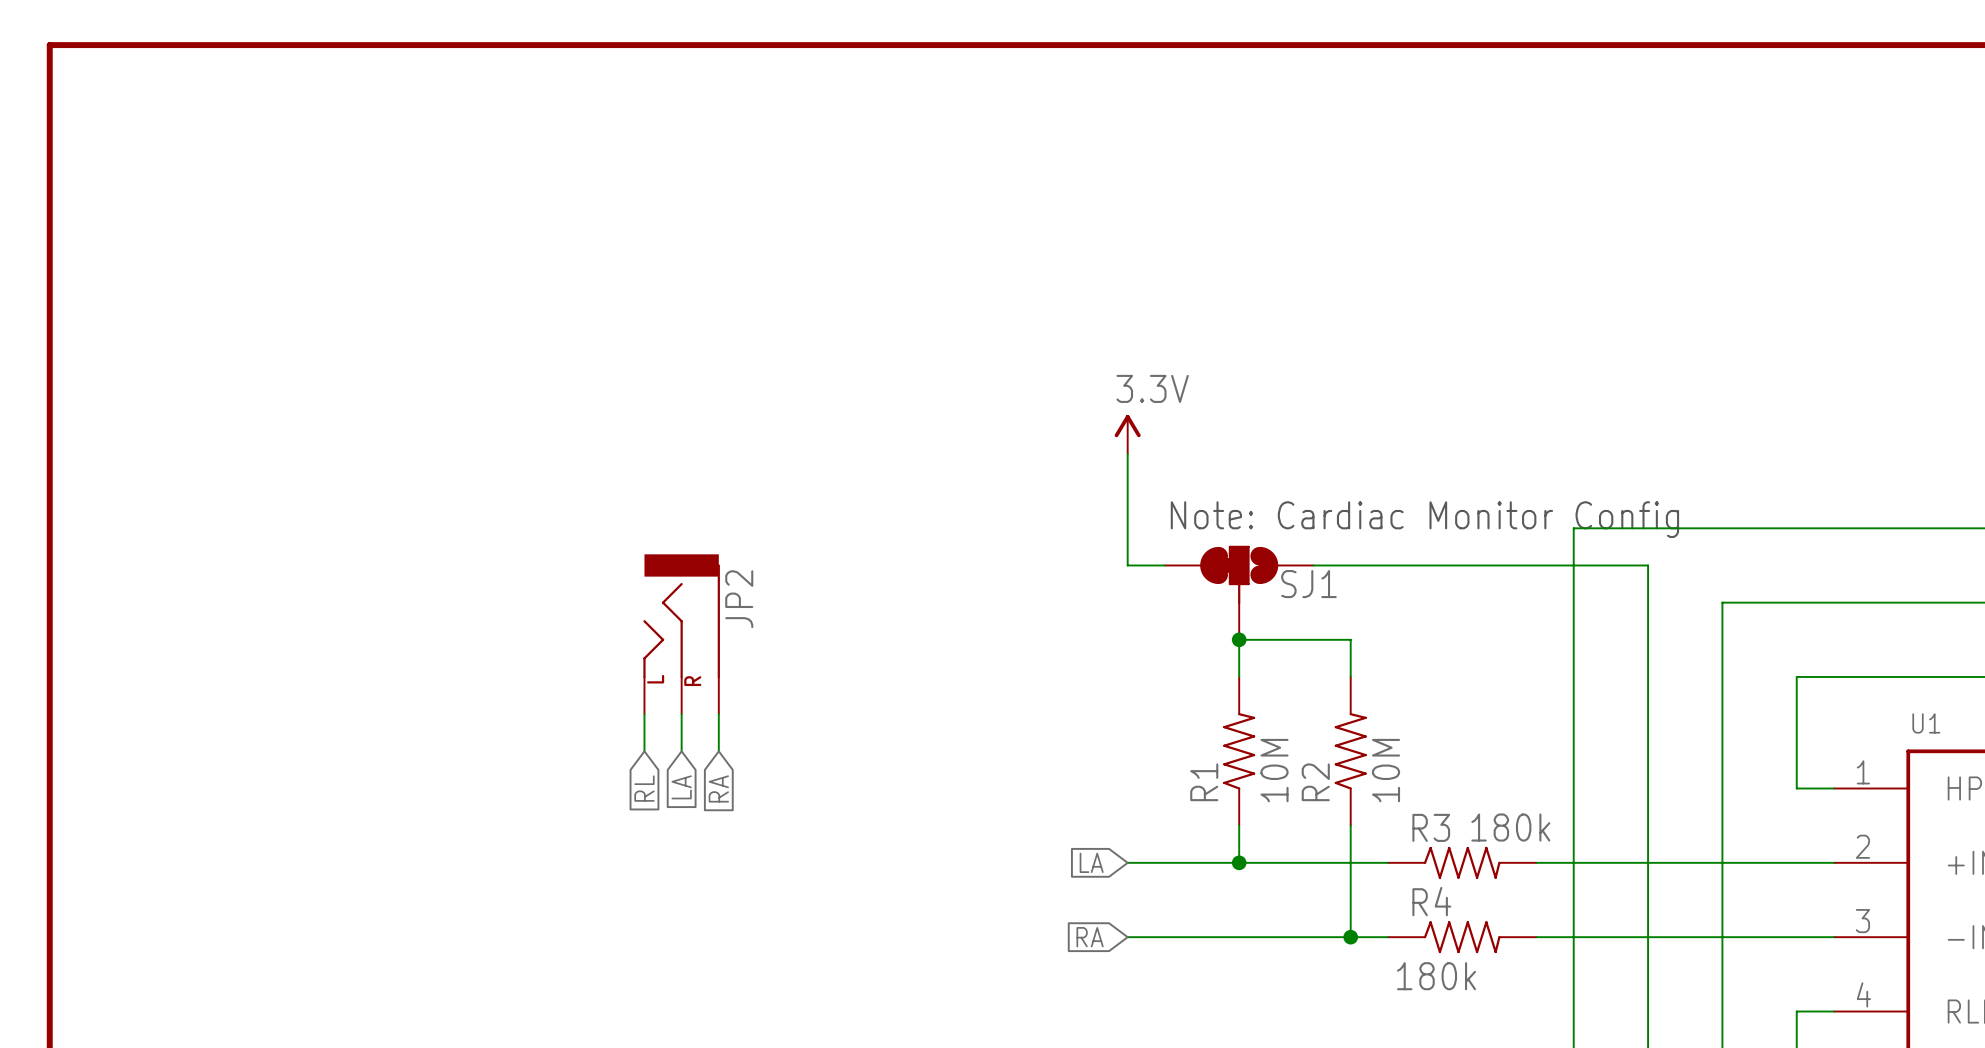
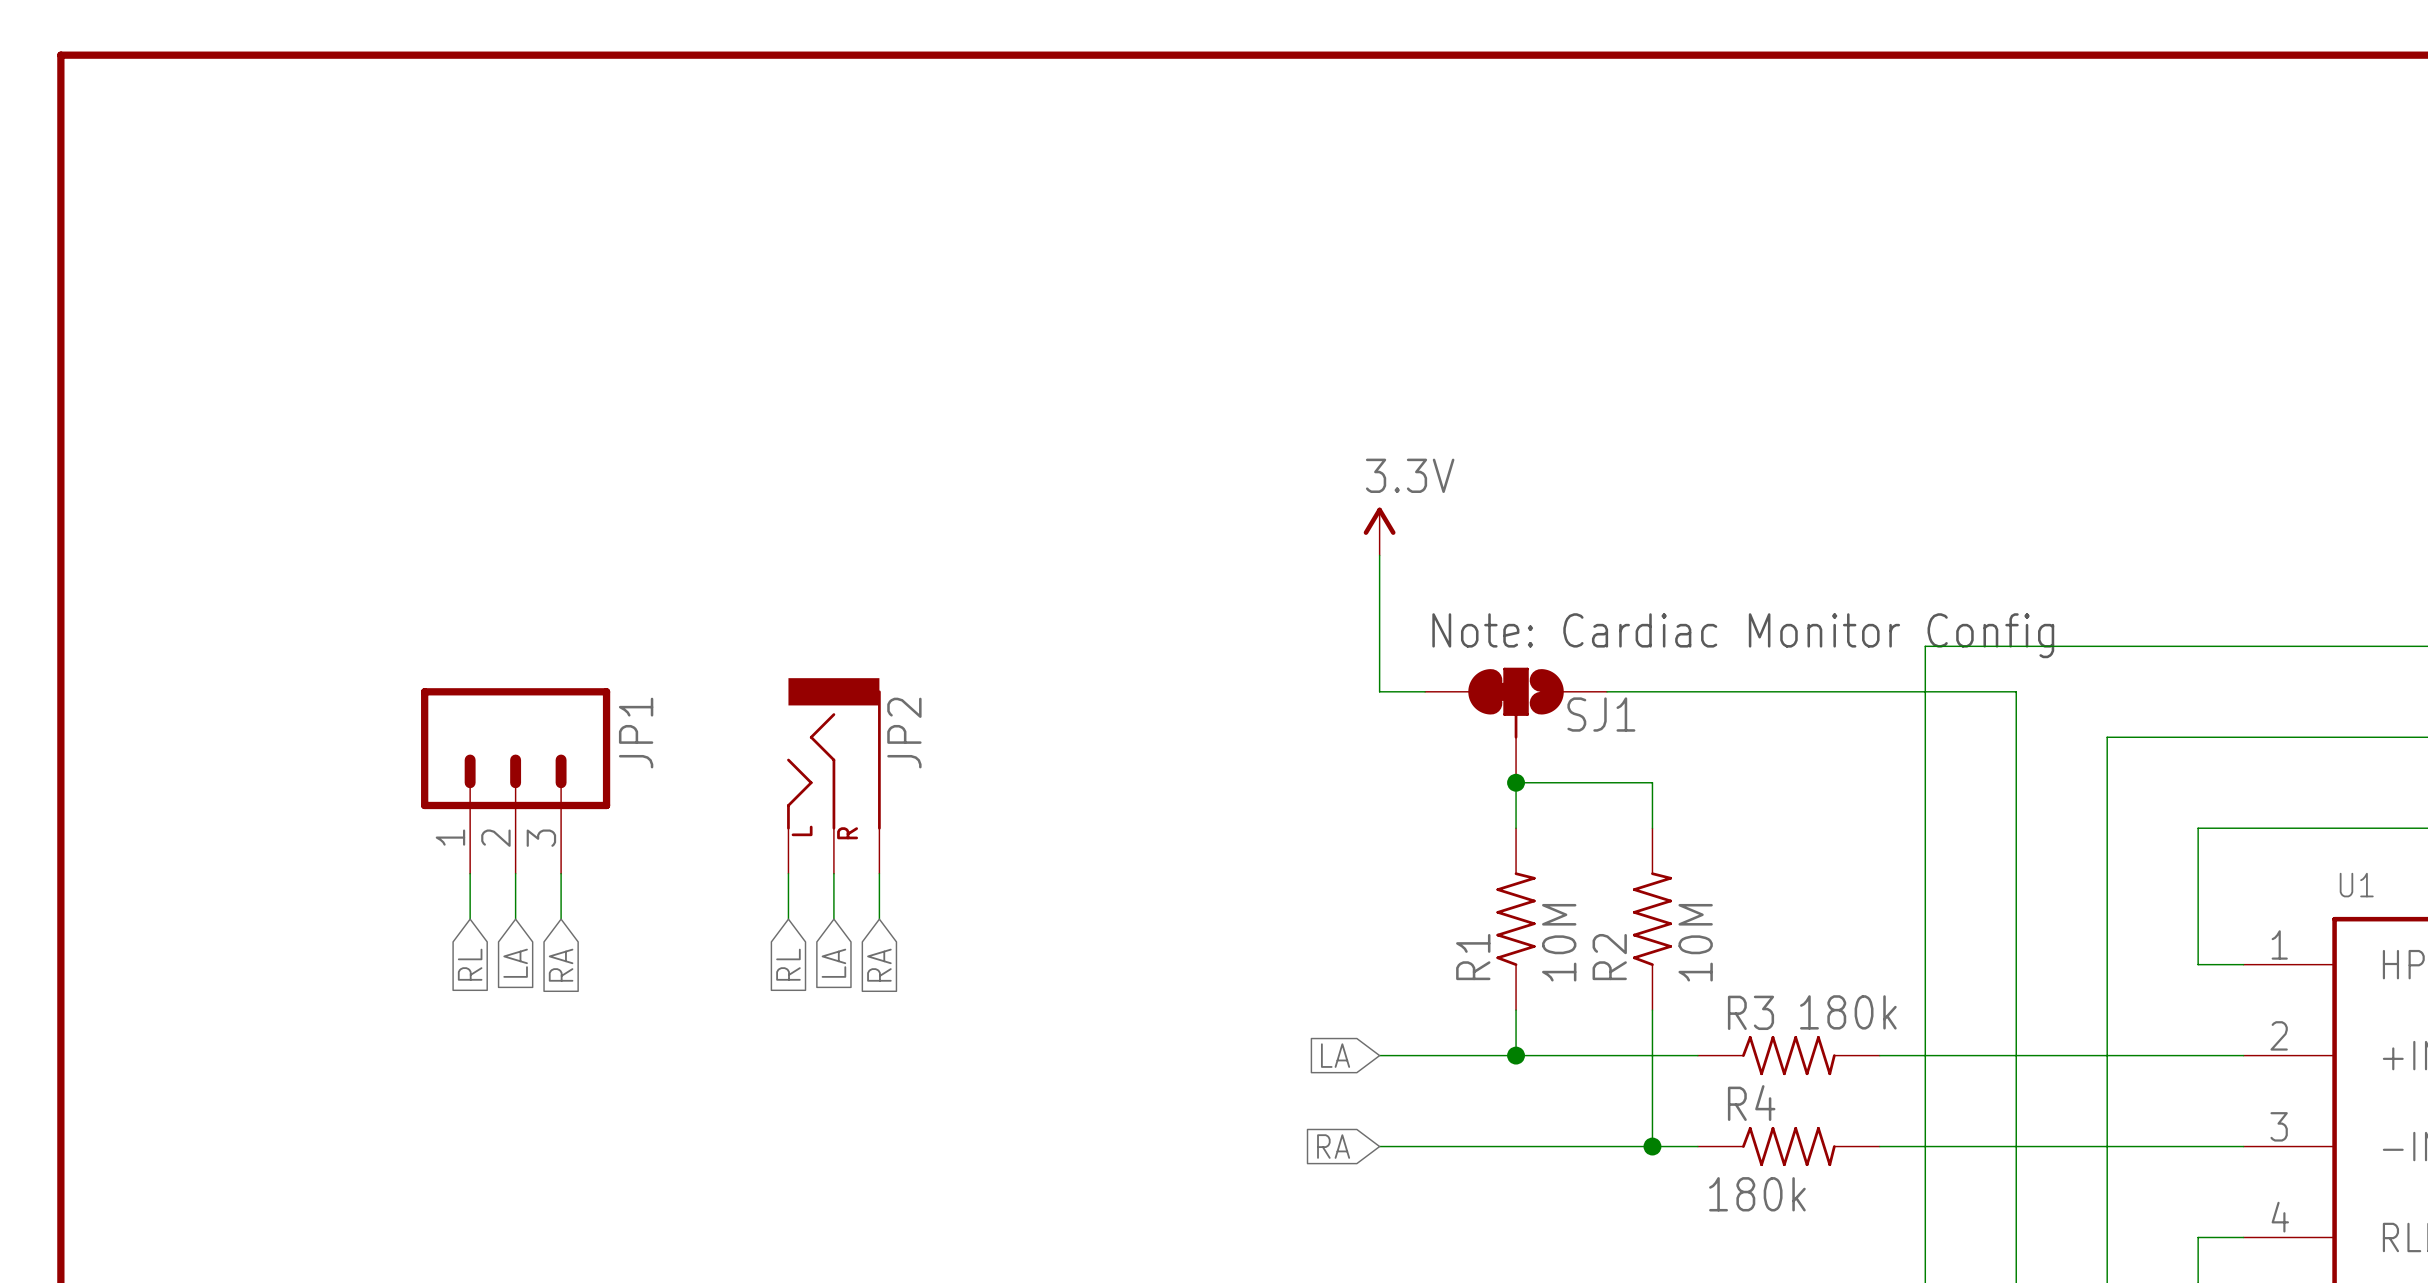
JP1: none -> (515, 780)
wire: none -> (470, 873) (470, 919)
wire: none -> (515, 873) (515, 919)
wire: none -> (561, 873) (561, 919)
global label: none -> LA (515, 963)
global label: none -> RL (470, 964)
global label: none -> RA (561, 965)

